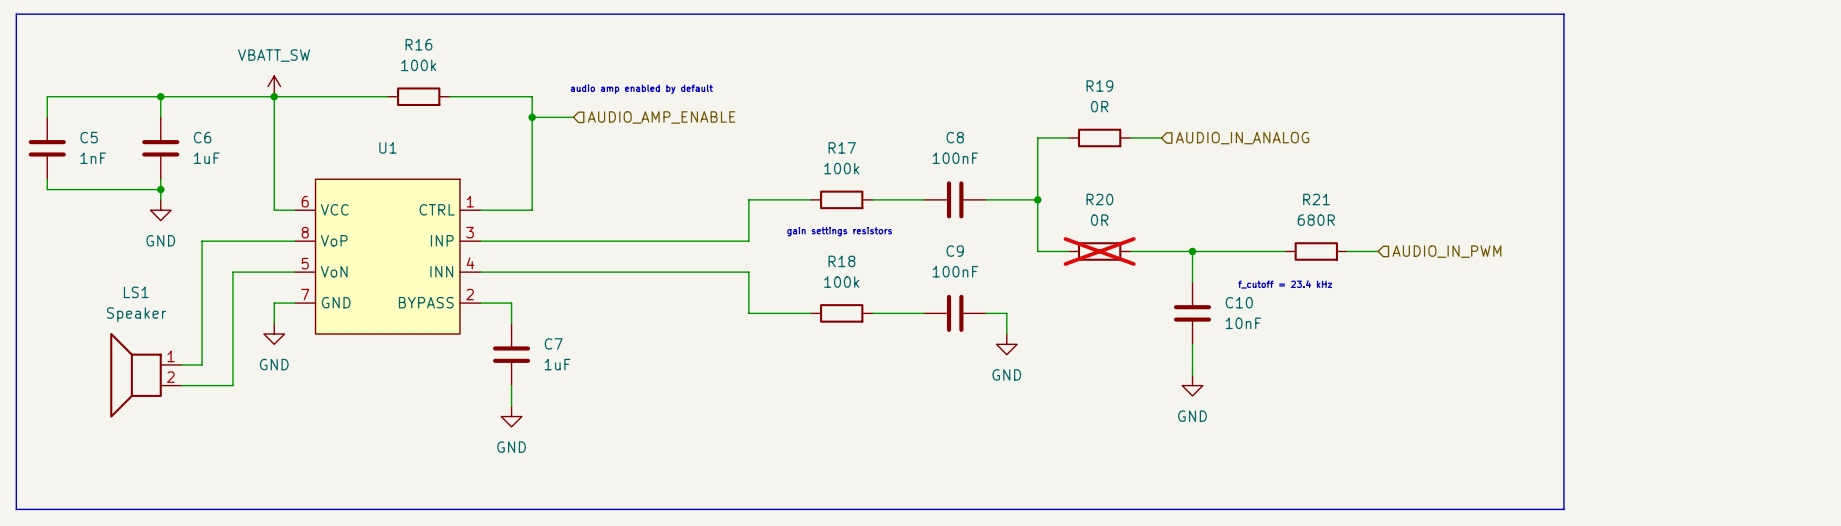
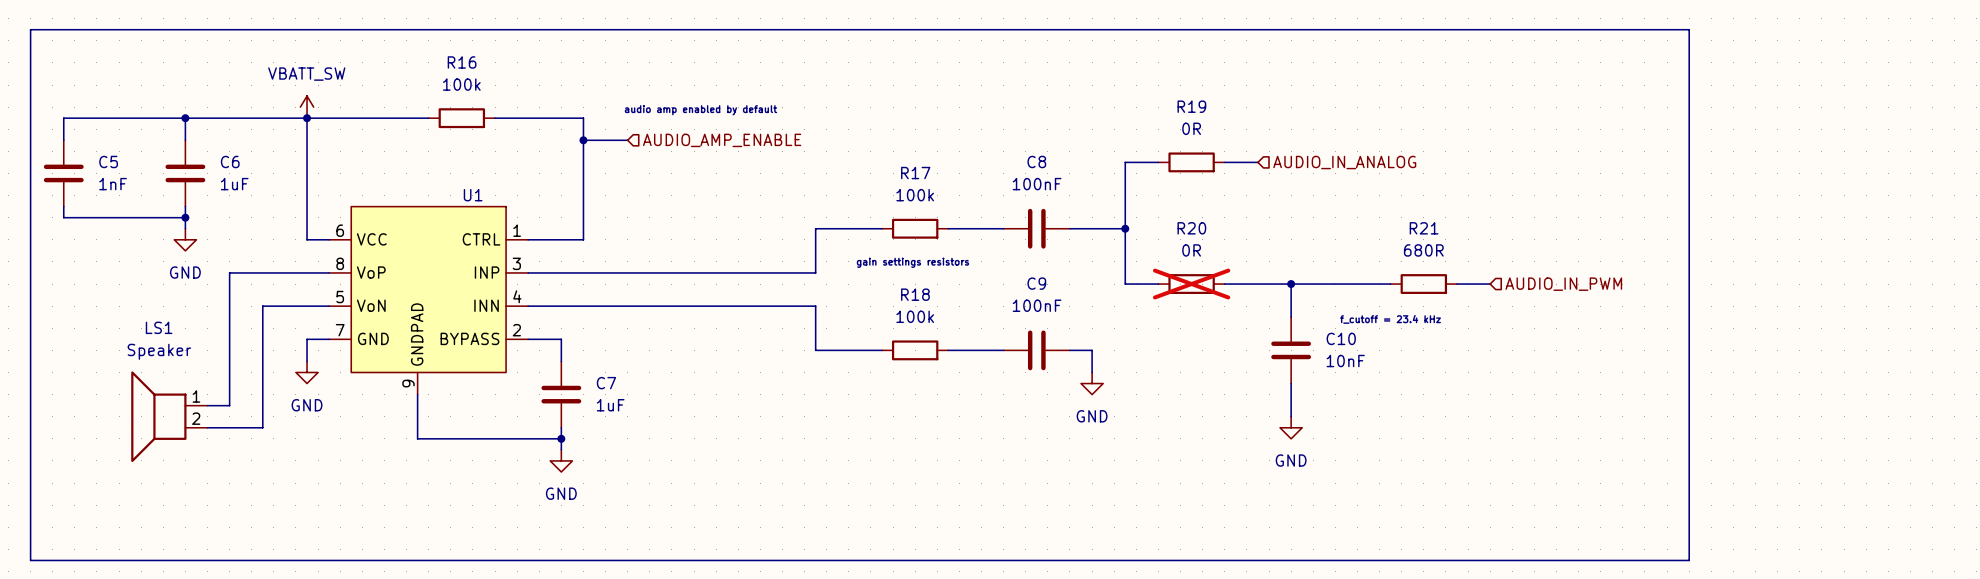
U1 name position: U1 (387, 147) -> U1 (473, 195)
U1 symbol: [294, 179, 481, 335] -> [329, 206, 529, 395]
wire: none -> (417, 394) (417, 438) (561, 438)
junction: none -> (561, 438)

